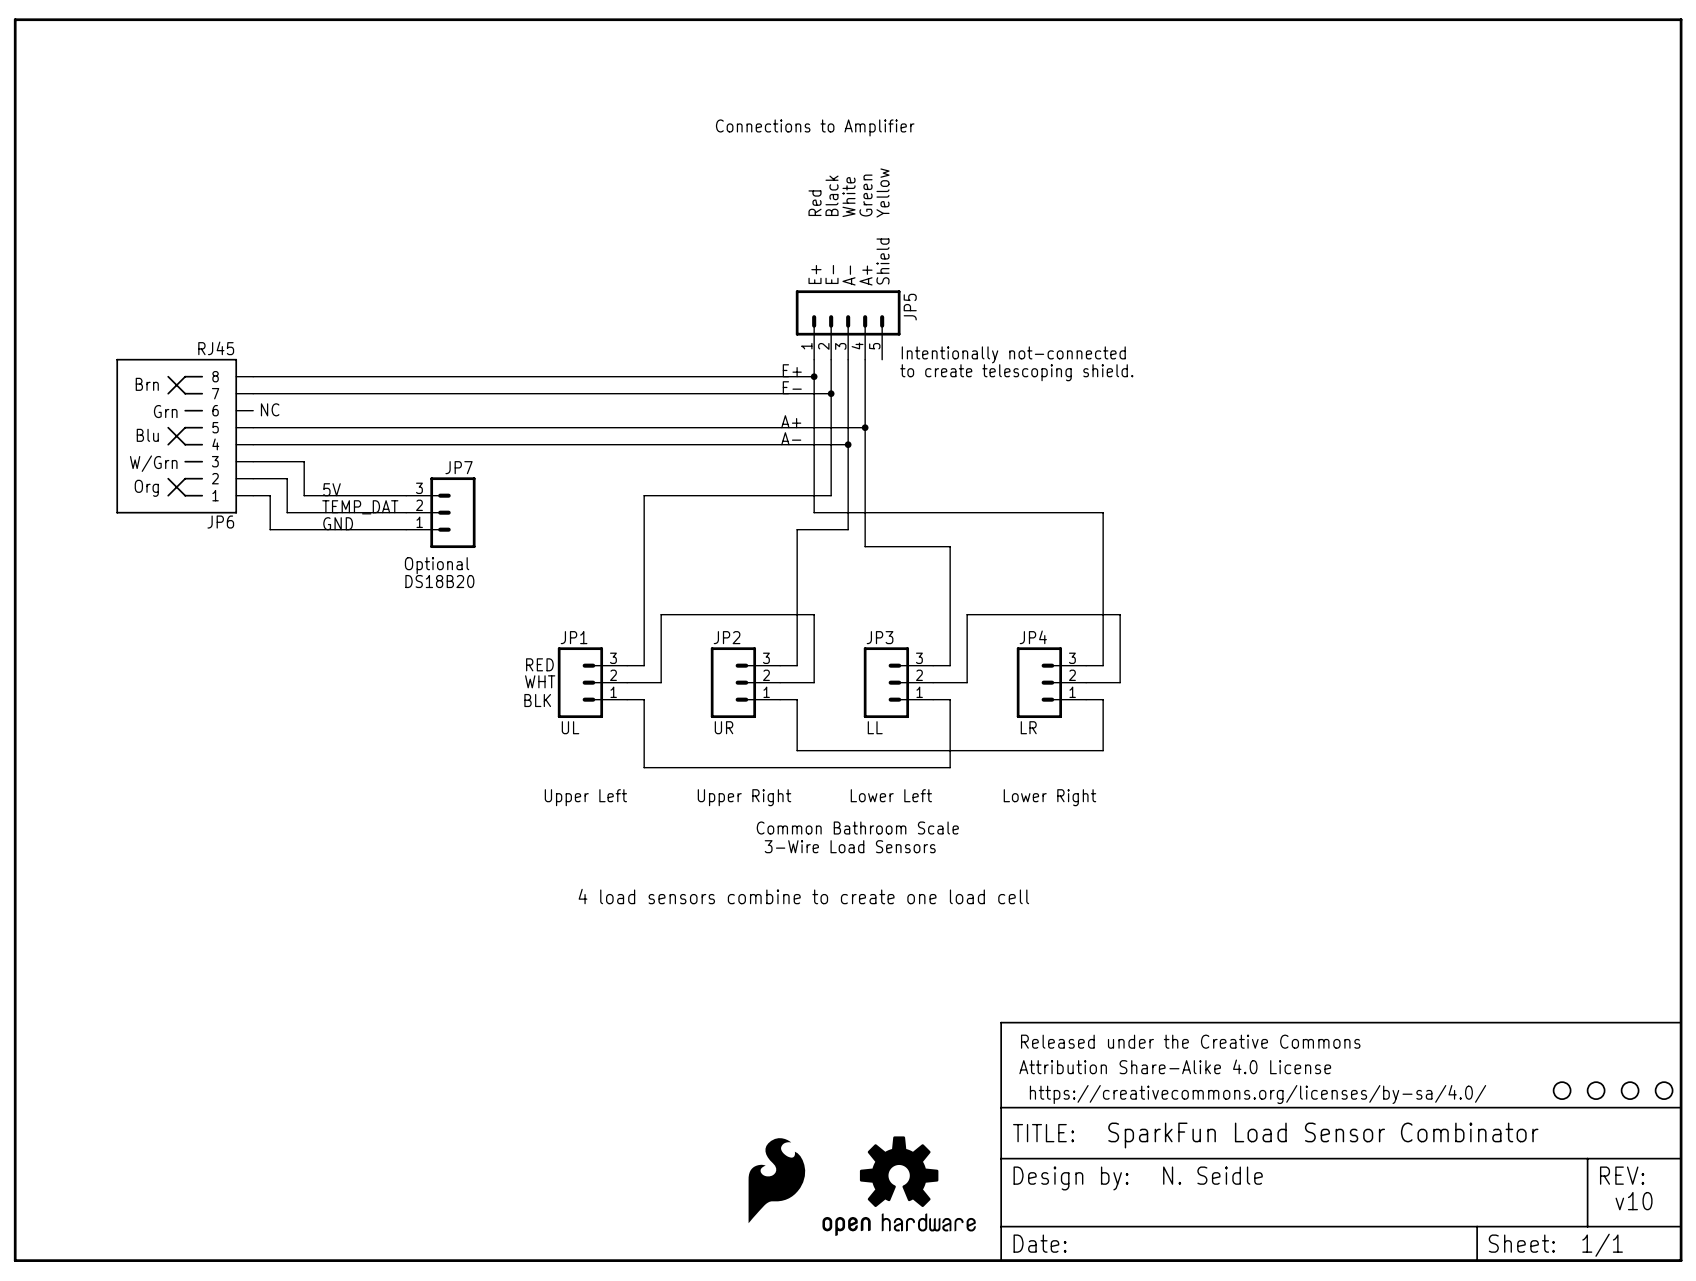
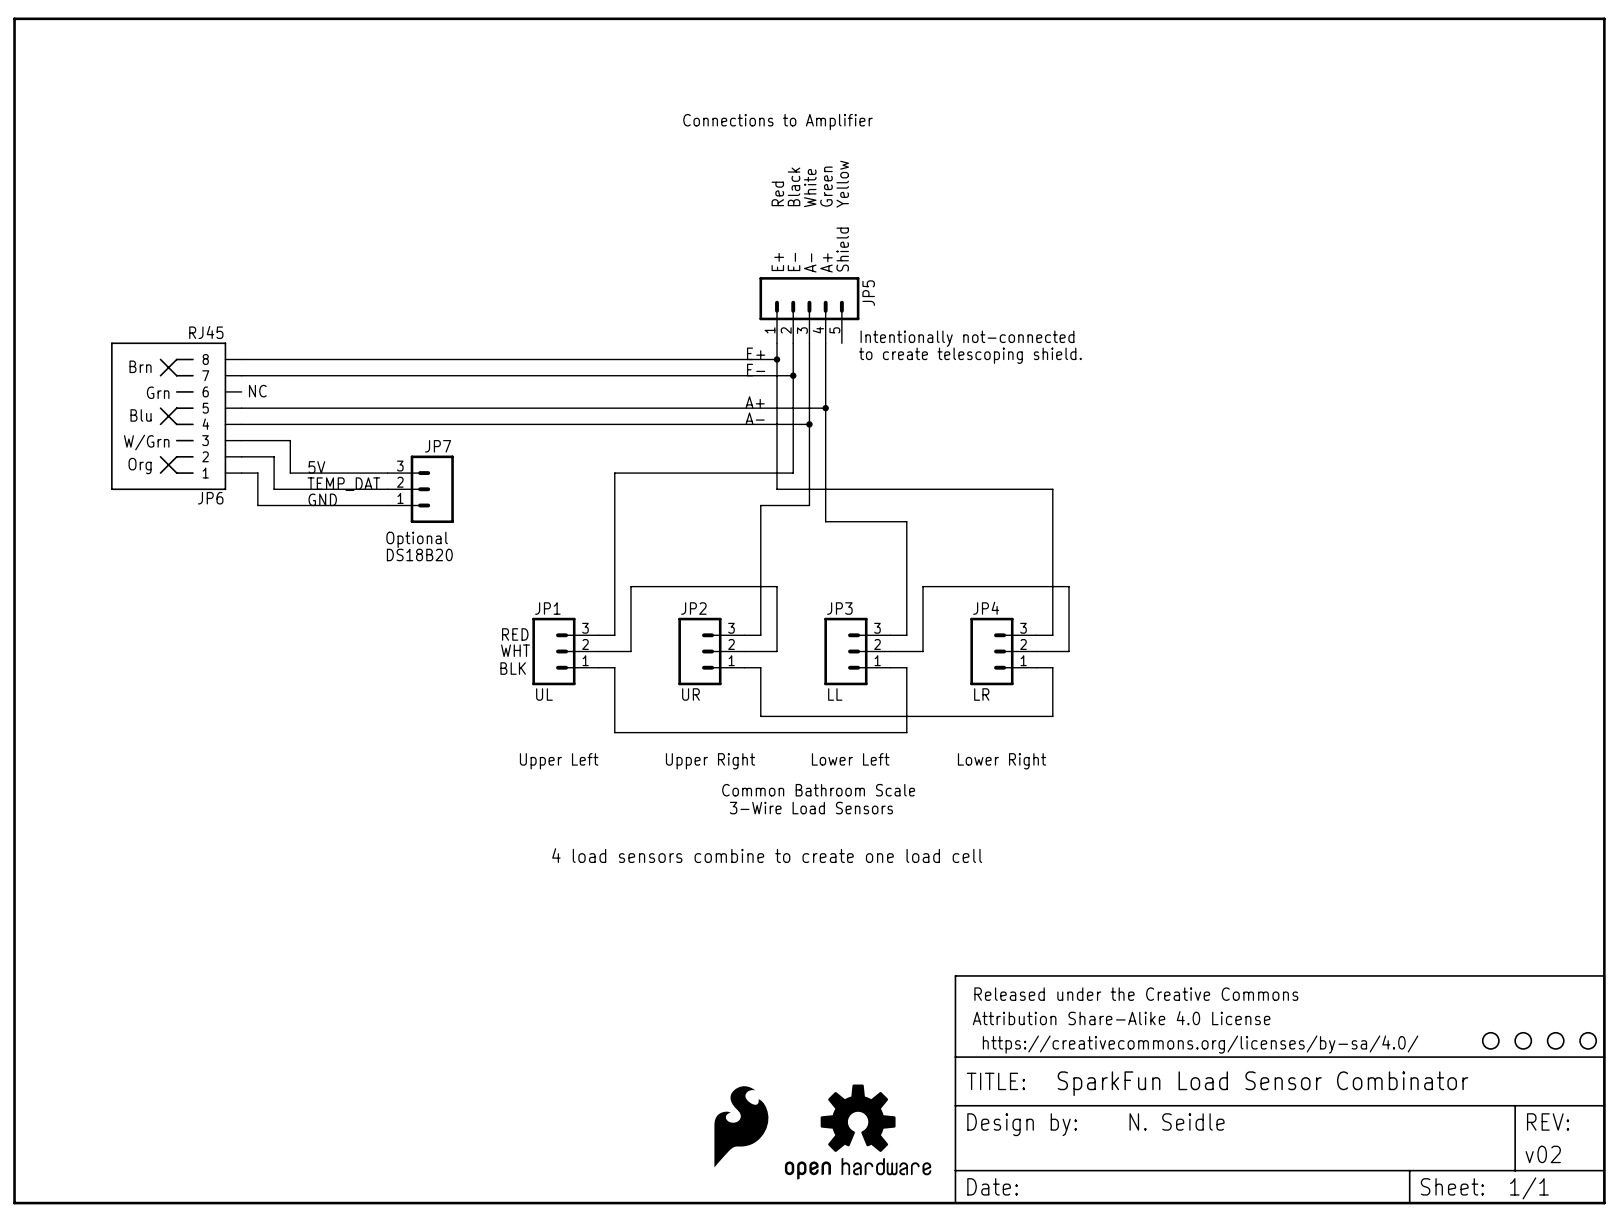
text: N. Seidle (1212, 1175) -> none
part text: none -> N. Seidle (1177, 1121)
text: v10 (1634, 1201) -> none
part text: none -> v02 (1543, 1154)

